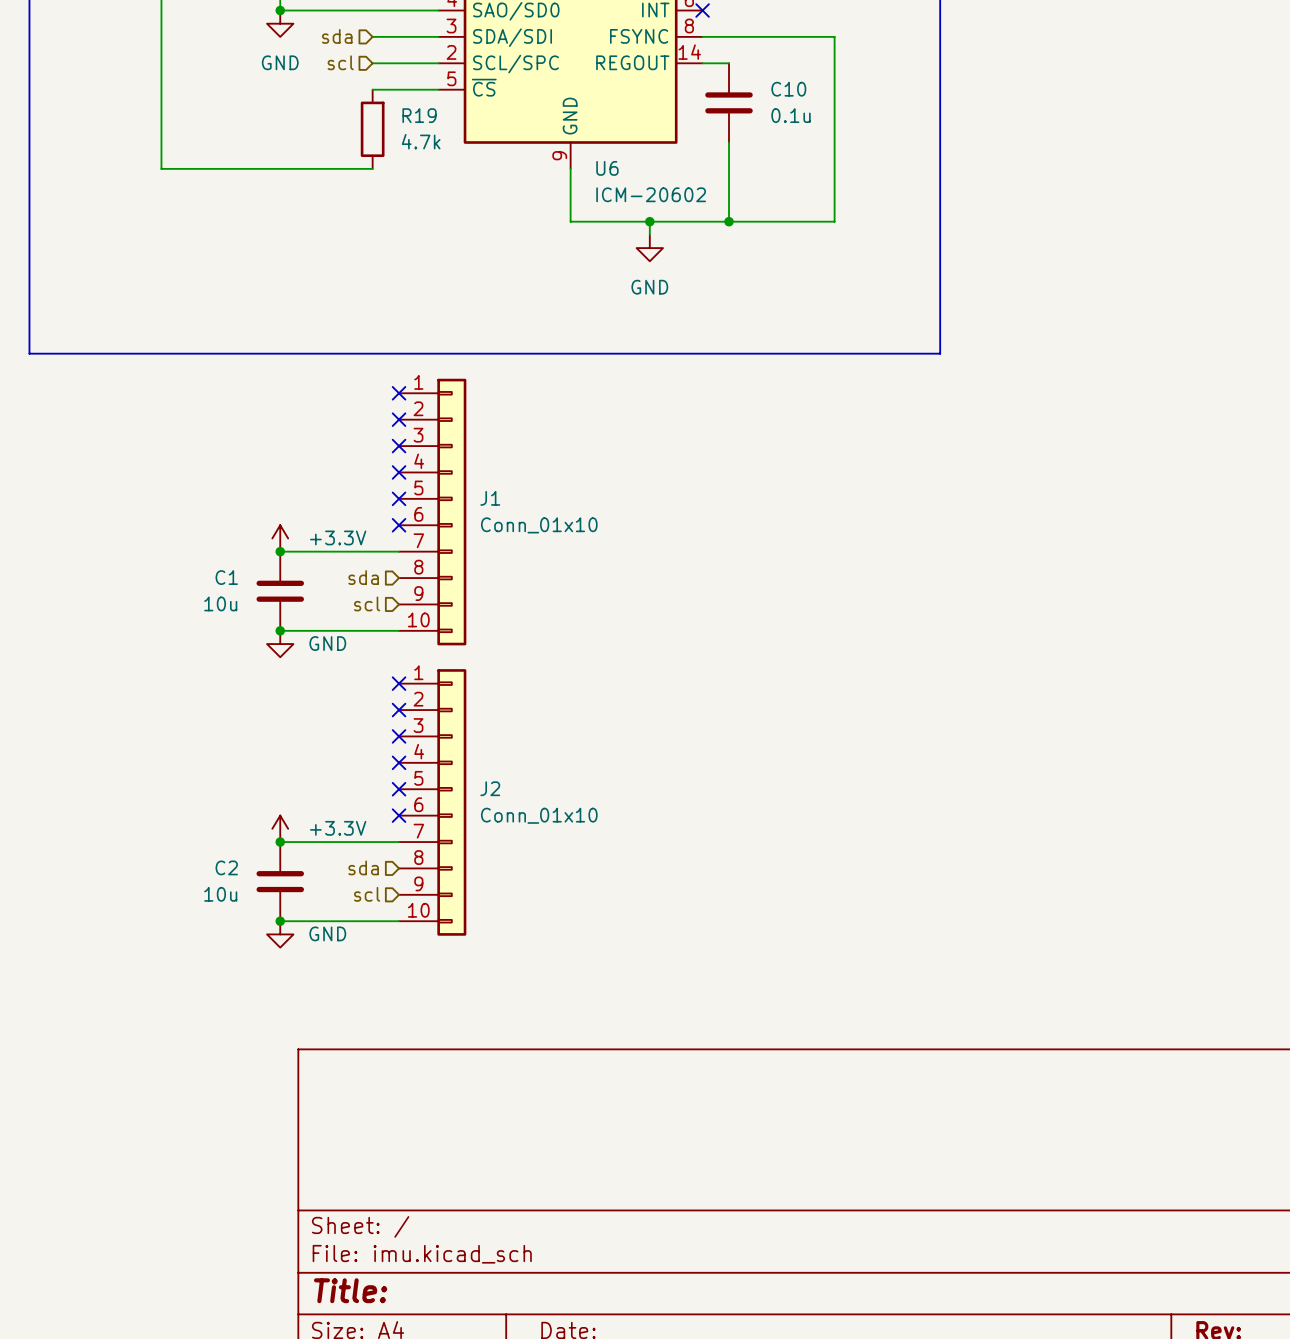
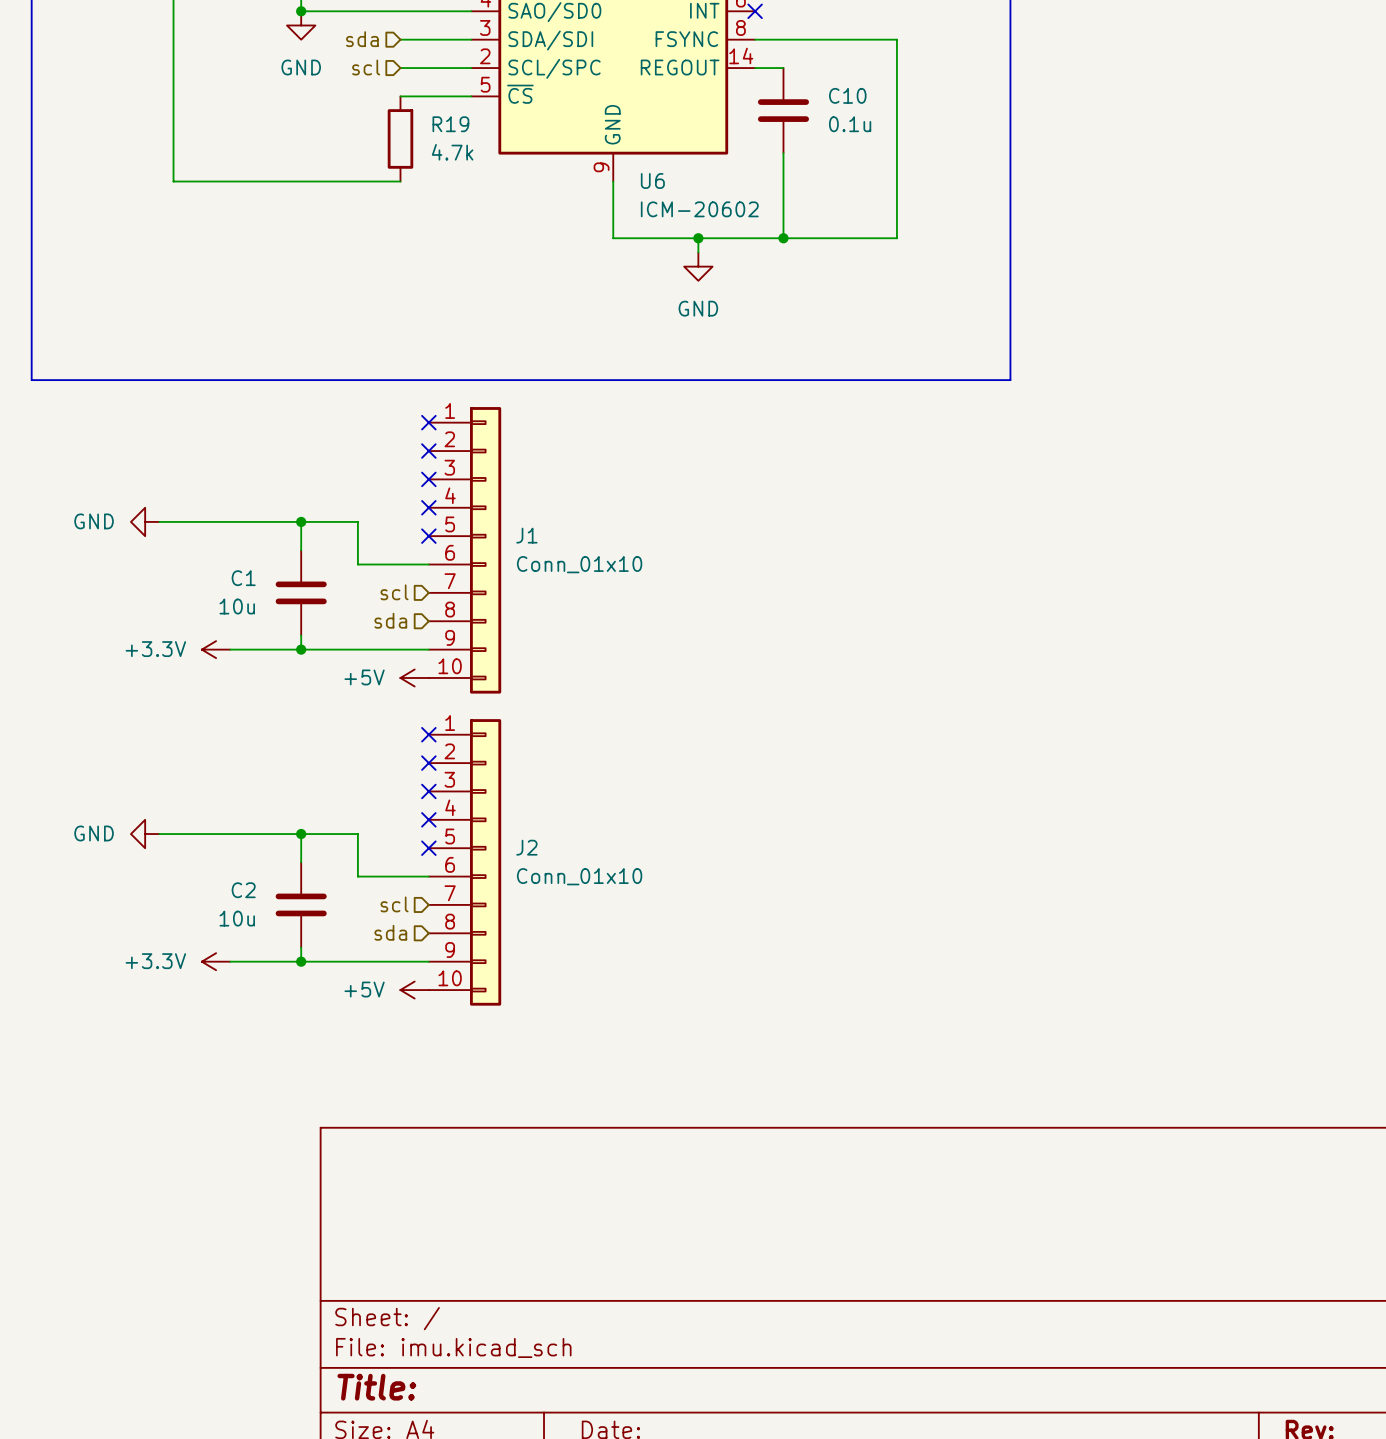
power symbol: none -> GND (145, 521)
wire: none -> (159, 521) (357, 521) (357, 564) (428, 564)
wire: none -> (301, 521) (301, 550)
junction: none -> (301, 521)
no-connect mark: (399, 525) -> none
power symbol text position: +3.3V (338, 537) -> +3.3V (155, 649)
power symbol rotation: 0° (280, 538) -> 90° counterclockwise (216, 649)
power symbol position: +3.3V (280, 538) -> +3.3V (216, 649)
wire: (280, 551) (399, 551) -> none
junction: (280, 551) -> none
C1 position: (280, 591) -> (301, 592)
hierarchical label position: scl (367, 603) -> scl (394, 592)
wire: none -> (230, 649) (428, 649)
junction: none -> (301, 649)
wire: (280, 630) (399, 630) -> none
junction: (280, 630) -> none
power symbol: none -> +5V (414, 677)
power symbol: GND (280, 644) -> none
power symbol: none -> GND (145, 834)
wire: none -> (159, 834) (357, 834) (357, 876) (428, 876)
wire: none -> (301, 834) (301, 862)
junction: none -> (301, 834)
no-connect mark: (399, 815) -> none
power symbol rotation: 0° (280, 828) -> 90° counterclockwise (216, 961)
power symbol position: +3.3V (280, 828) -> +3.3V (216, 961)
power symbol text position: +3.3V (338, 828) -> +3.3V (155, 961)
wire: (280, 842) (399, 842) -> none
junction: (280, 842) -> none
C2 position: (280, 881) -> (301, 904)
wire: none -> (230, 961) (428, 961)
junction: none -> (301, 961)
hierarchical label position: scl (367, 894) -> scl (394, 904)
wire: (280, 921) (399, 921) -> none
junction: (280, 921) -> none
power symbol: none -> +5V (414, 990)
power symbol: GND (280, 934) -> none

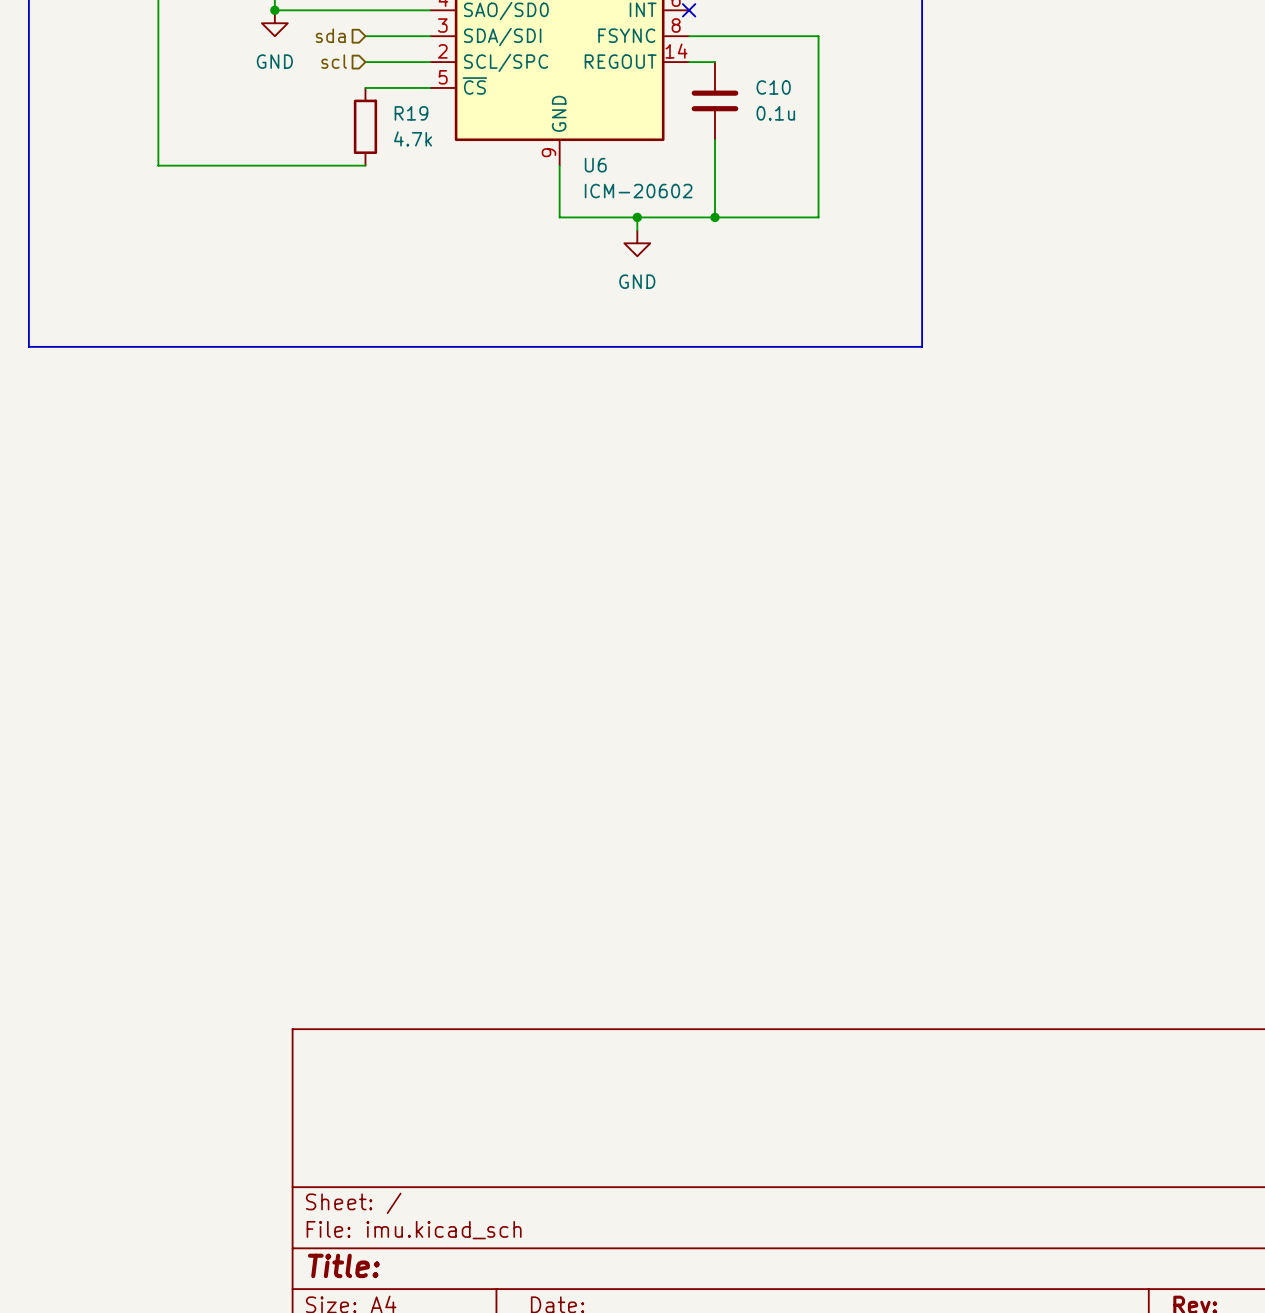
no-connect mark: (428, 422) -> none
no-connect mark: (428, 451) -> none
no-connect mark: (428, 479) -> none
no-connect mark: (428, 507) -> none
power symbol: GND (145, 521) -> none
wire: (159, 521) (357, 521) (357, 564) (428, 564) -> none
wire: (301, 521) (301, 550) -> none
junction: (301, 521) -> none
no-connect mark: (428, 536) -> none
J1: Conn_01x10 (465, 550) -> none
C1: 10u (301, 592) -> none
hierarchical label: scl (394, 592) -> none
hierarchical label: sda (390, 620) -> none
wire: (301, 635) (301, 649) -> none
power symbol: +3.3V (216, 649) -> none
wire: (230, 649) (428, 649) -> none
junction: (301, 649) -> none
power symbol: +5V (414, 677) -> none
no-connect mark: (428, 734) -> none
no-connect mark: (428, 763) -> none
no-connect mark: (428, 791) -> none
no-connect mark: (428, 819) -> none
power symbol: GND (145, 834) -> none
wire: (159, 834) (357, 834) (357, 876) (428, 876) -> none
wire: (301, 834) (301, 862) -> none
junction: (301, 834) -> none
no-connect mark: (428, 848) -> none
J2: Conn_01x10 (465, 862) -> none
C2: 10u (301, 904) -> none
hierarchical label: scl (394, 904) -> none
hierarchical label: sda (390, 932) -> none
wire: (301, 947) (301, 961) -> none
power symbol: +3.3V (216, 961) -> none
wire: (230, 961) (428, 961) -> none
junction: (301, 961) -> none
power symbol: +5V (414, 990) -> none

